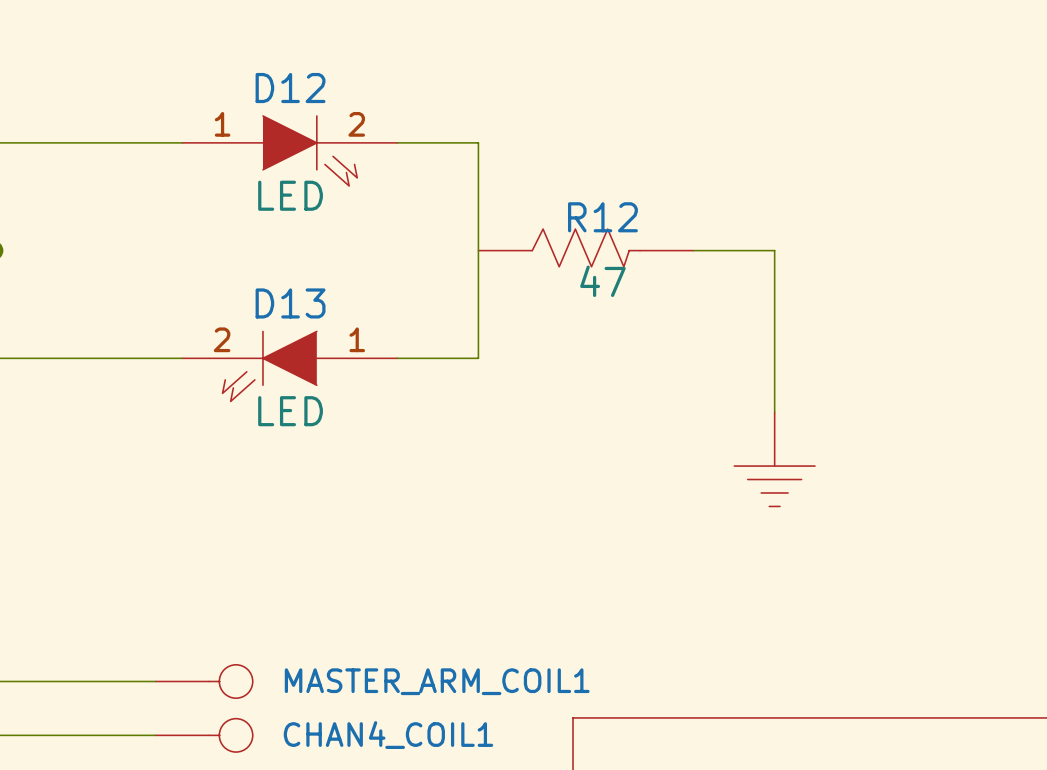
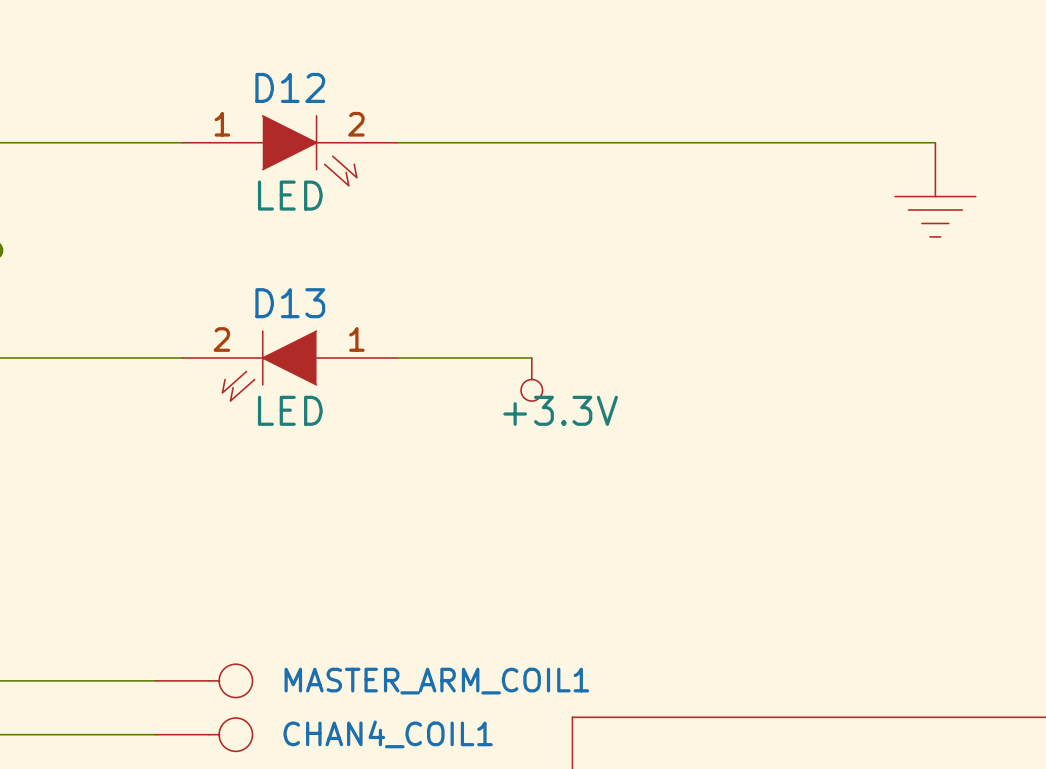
wire: (478, 142) (478, 358) -> (531, 358) (477, 358)
wire: none -> (477, 142) (935, 142)
R12: 47 (586, 247) -> none
wire: (693, 250) (774, 250) (774, 412) -> none
power symbol: none -> +3.3V (531, 379)
power symbol position: (774, 459) -> (935, 189)

